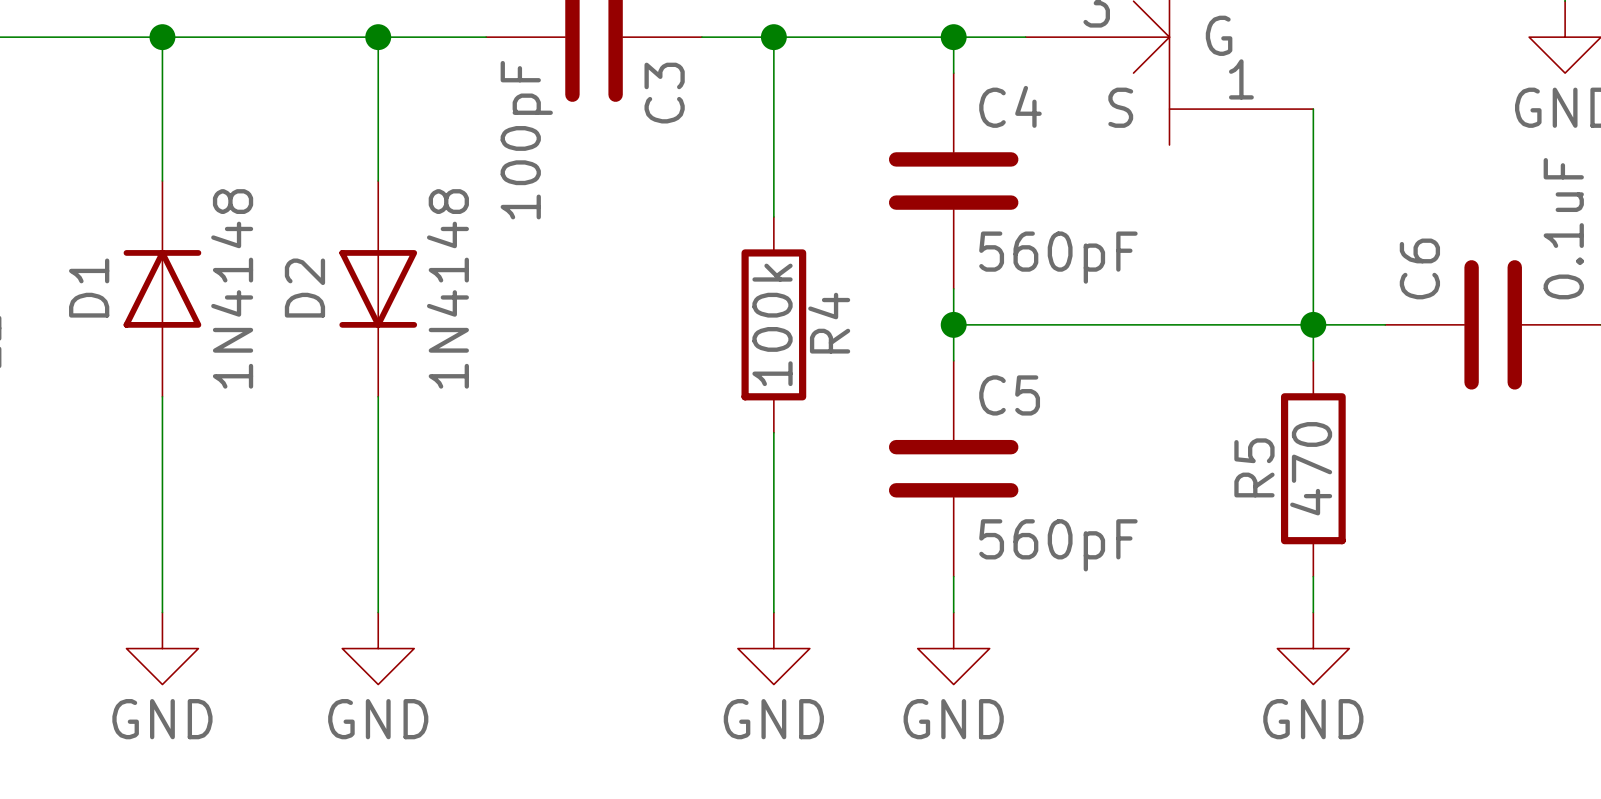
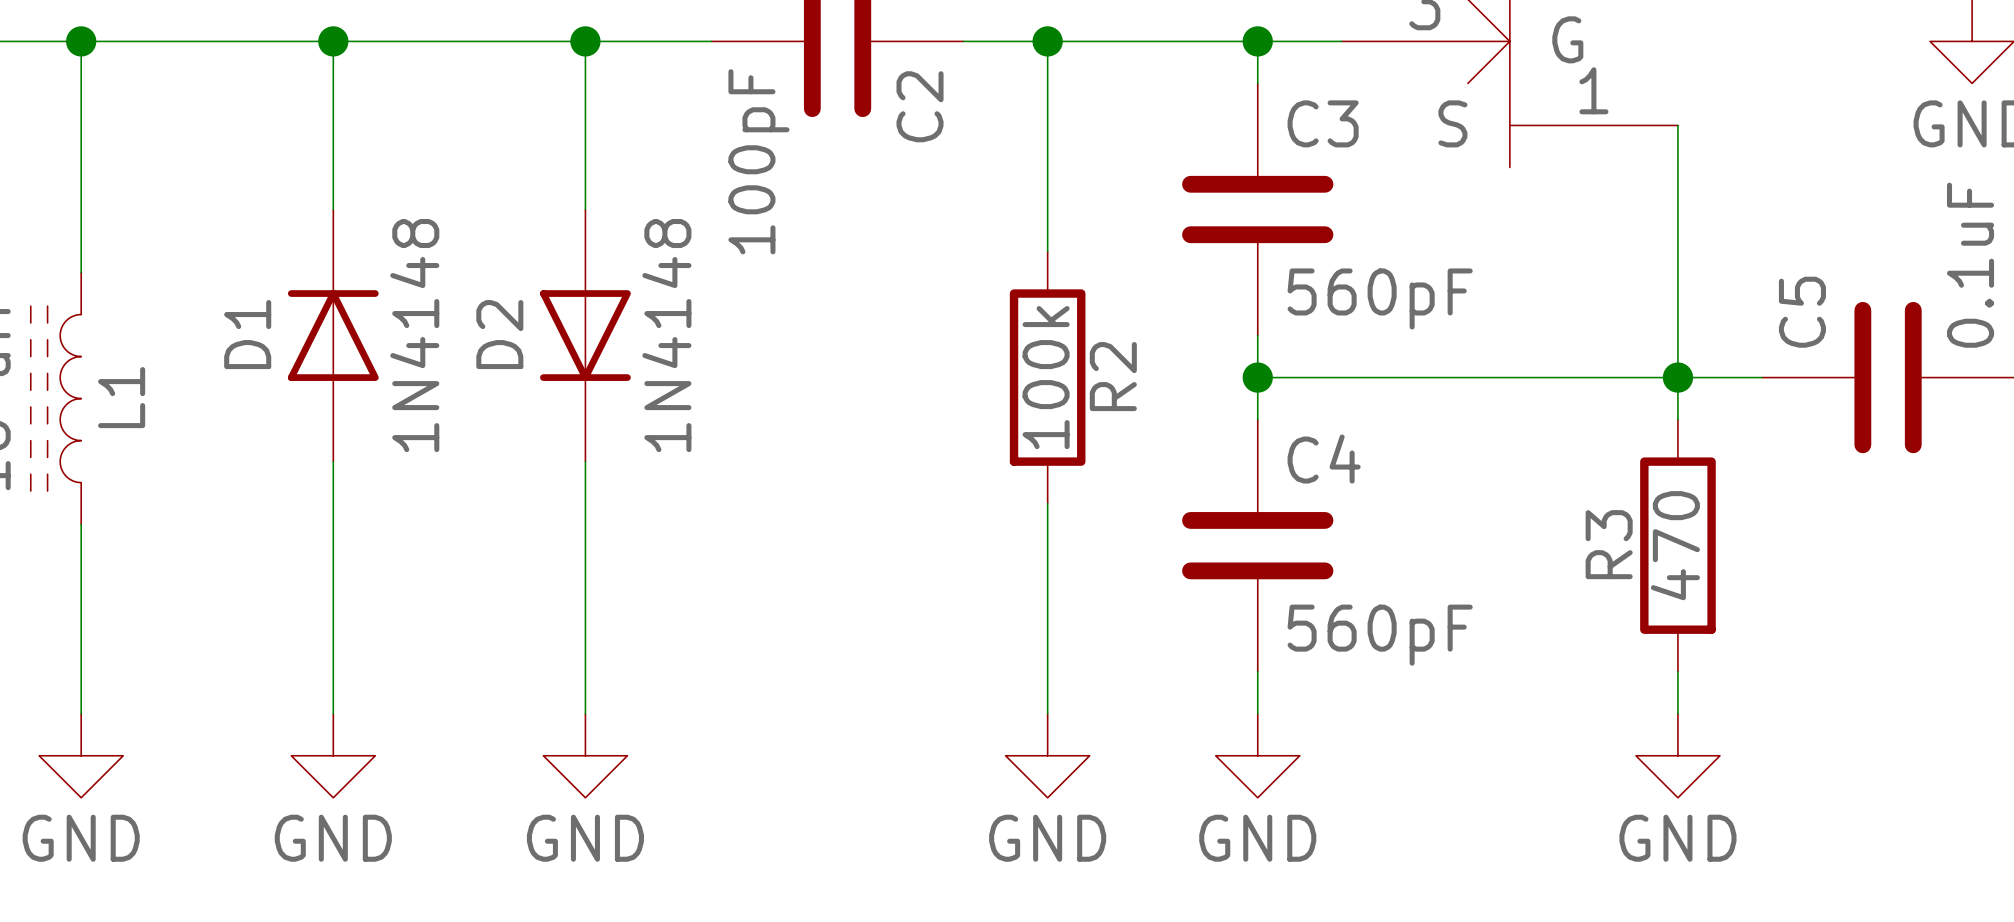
C3 name: C3 (664, 93) -> C2 (920, 106)
C4 name: C4 (1010, 106) -> C3 (1323, 123)
C6 name: C6 (1419, 268) -> C5 (1802, 312)
R4 name: R4 (829, 323) -> R2 (1113, 376)
C5 name: C5 (1009, 395) -> C4 (1324, 459)
R5 name: R5 (1254, 467) -> R3 (1609, 544)

